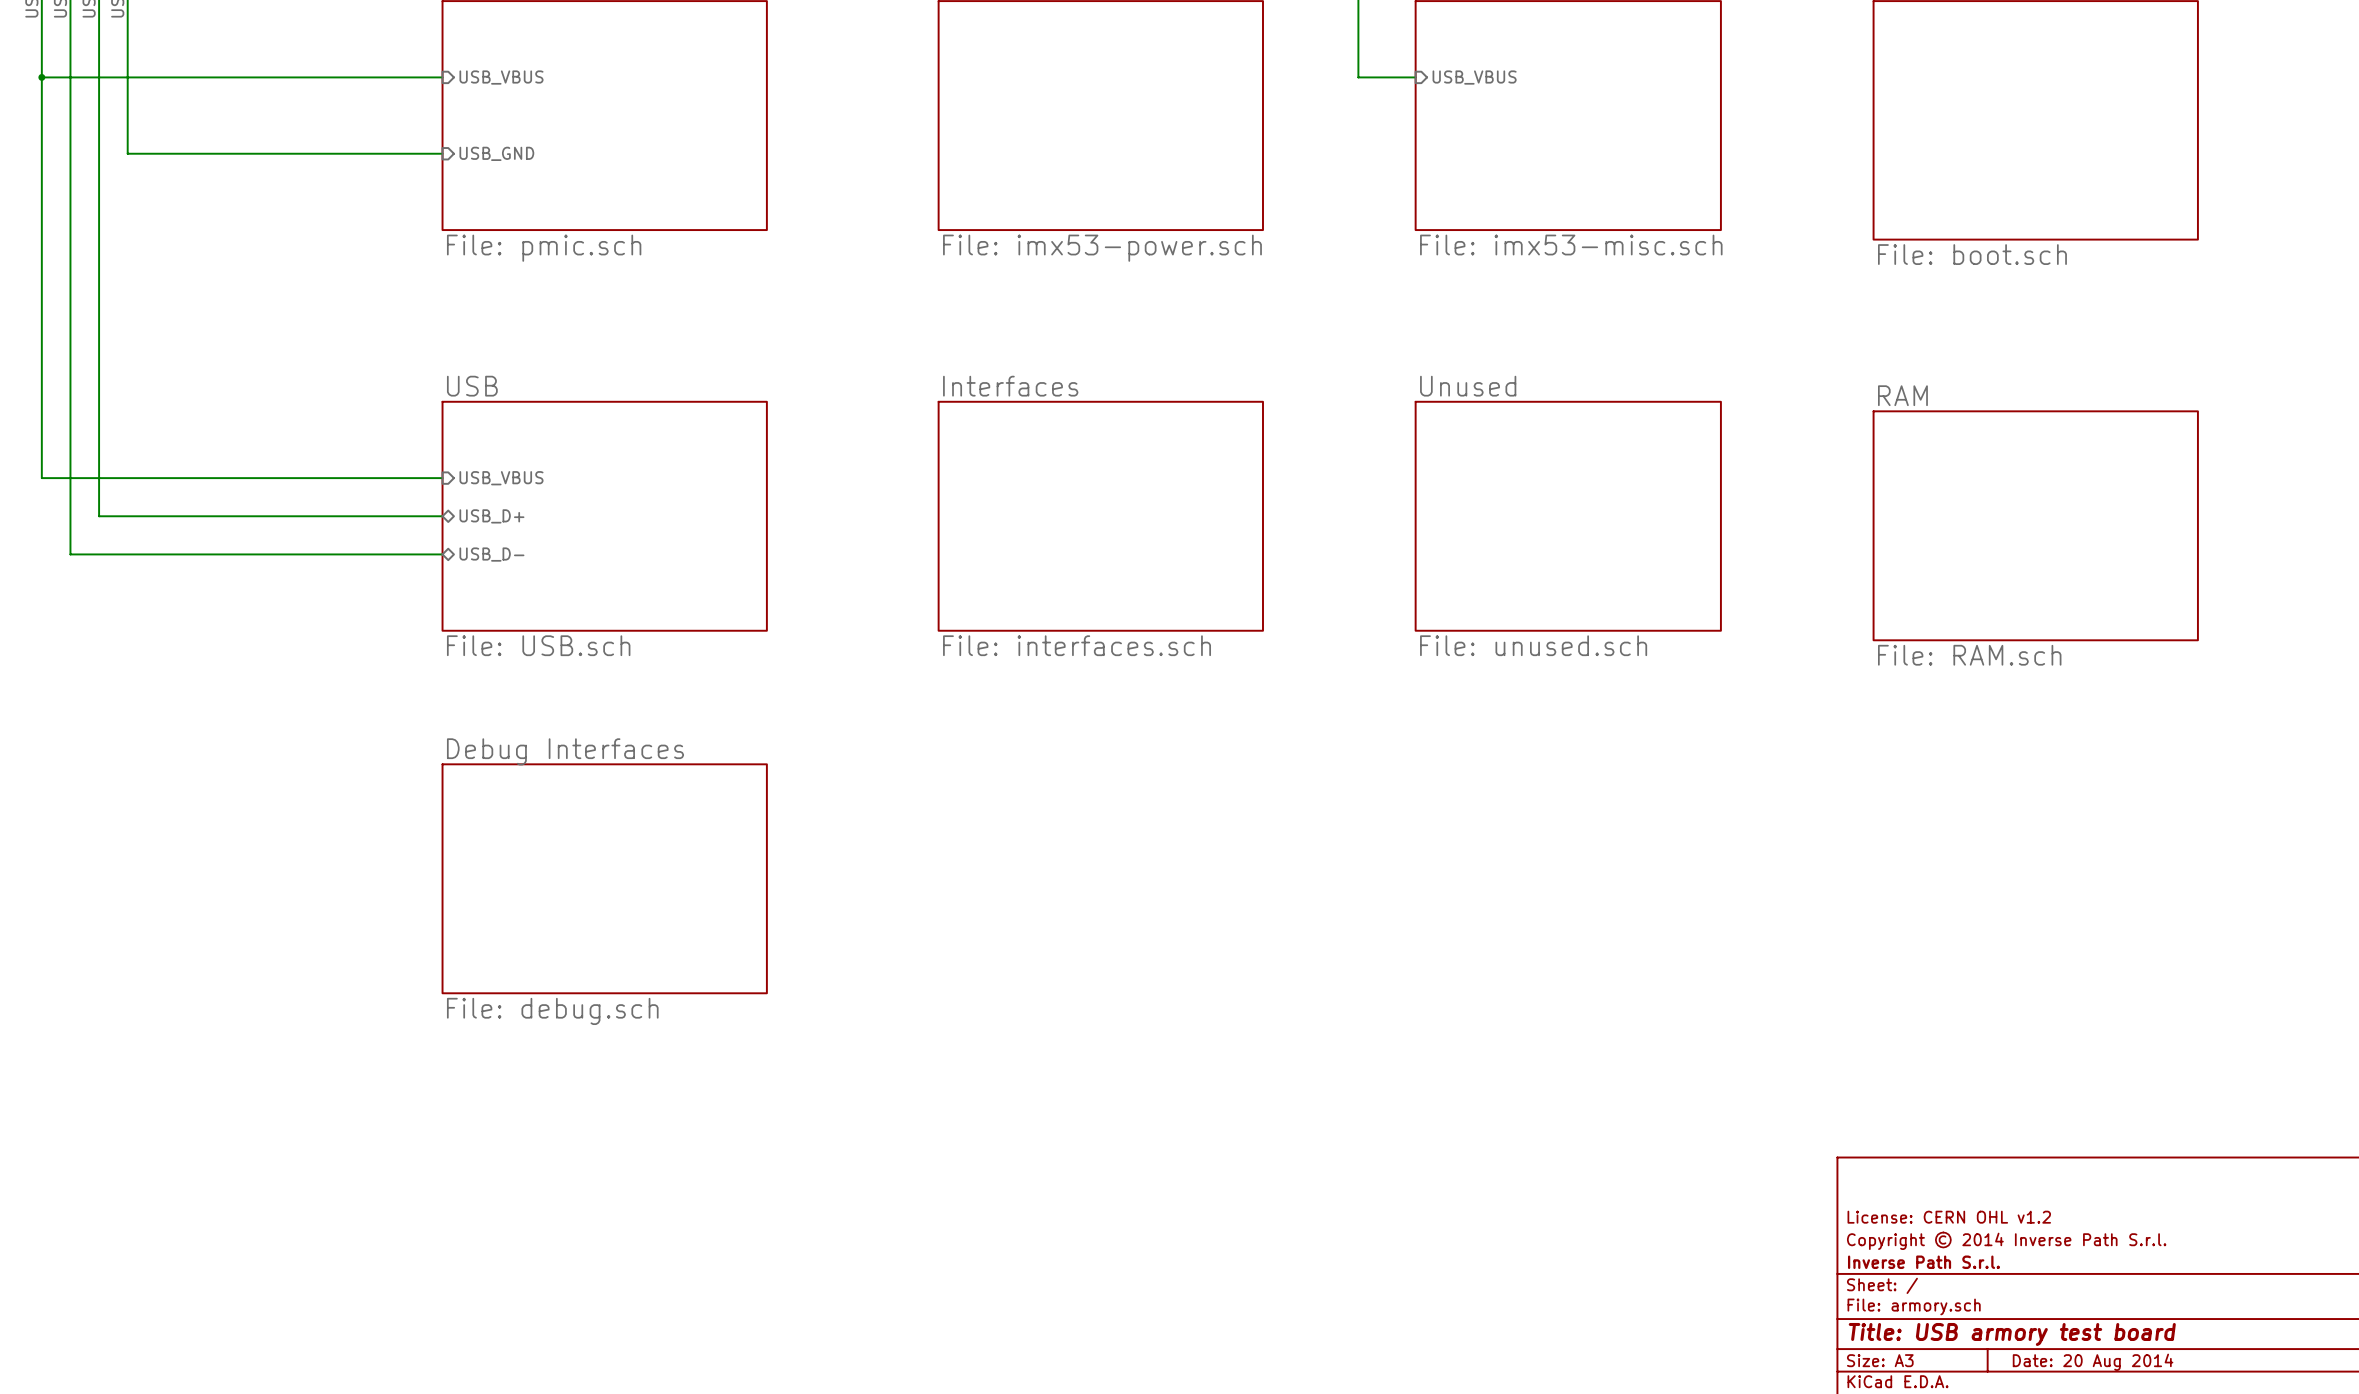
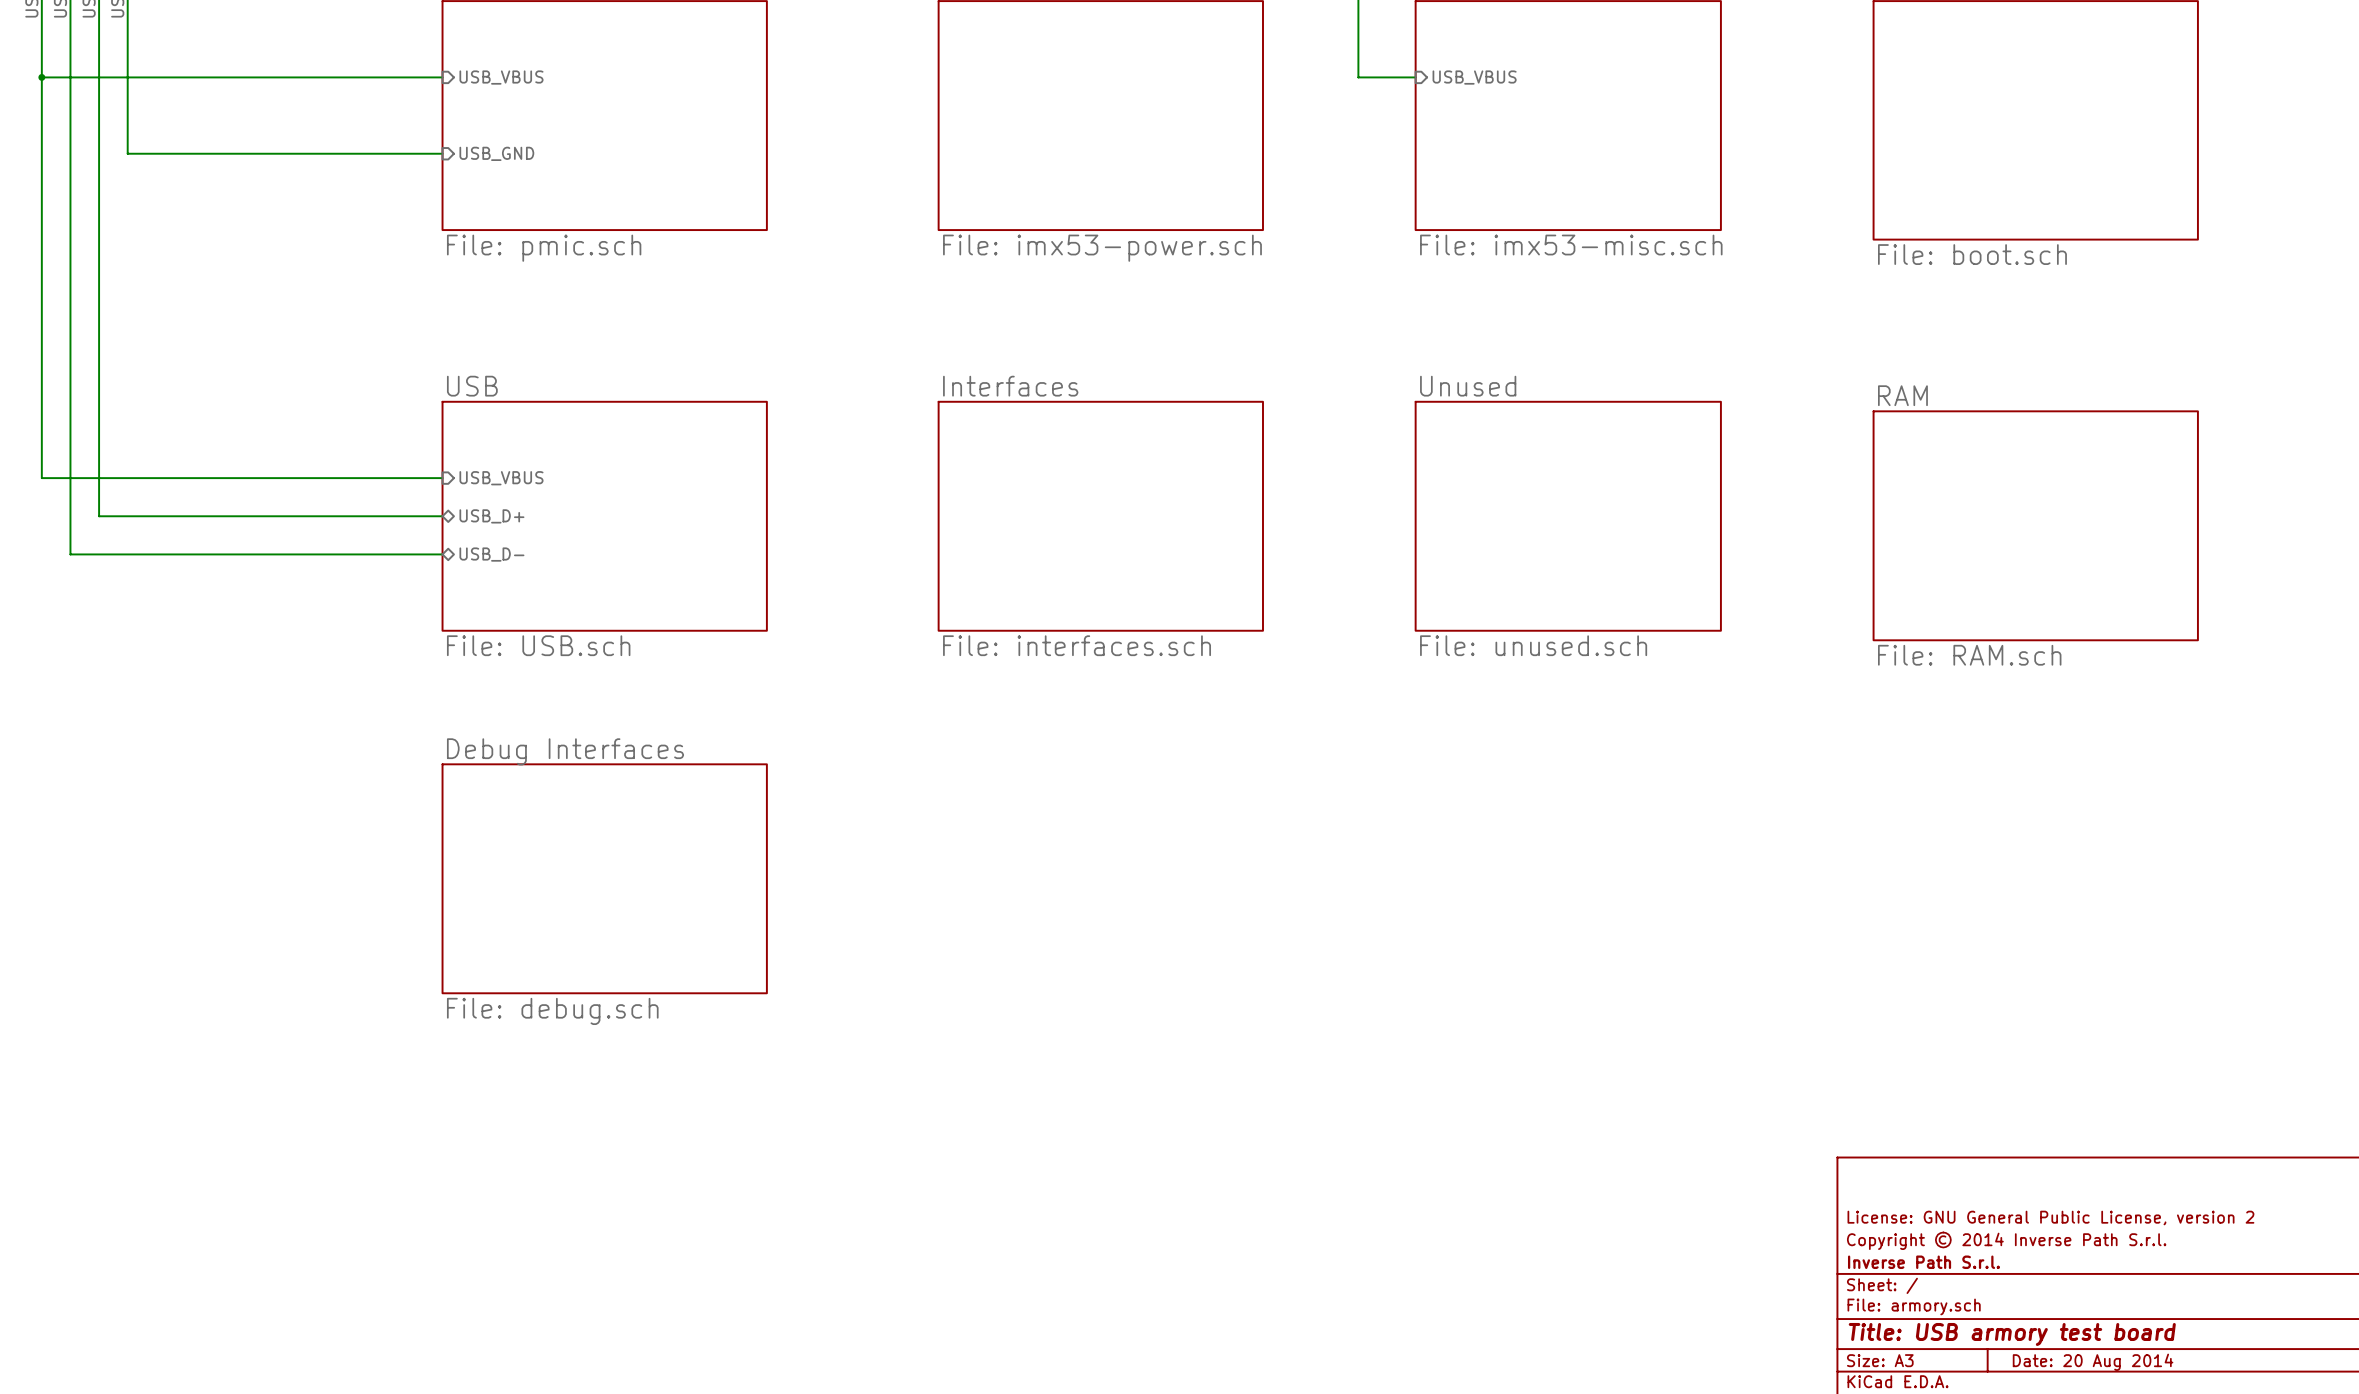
title block: License: CERN OHL v1.2 (1949, 1217) -> License: GNU General Public License, version 2 (2050, 1217)

